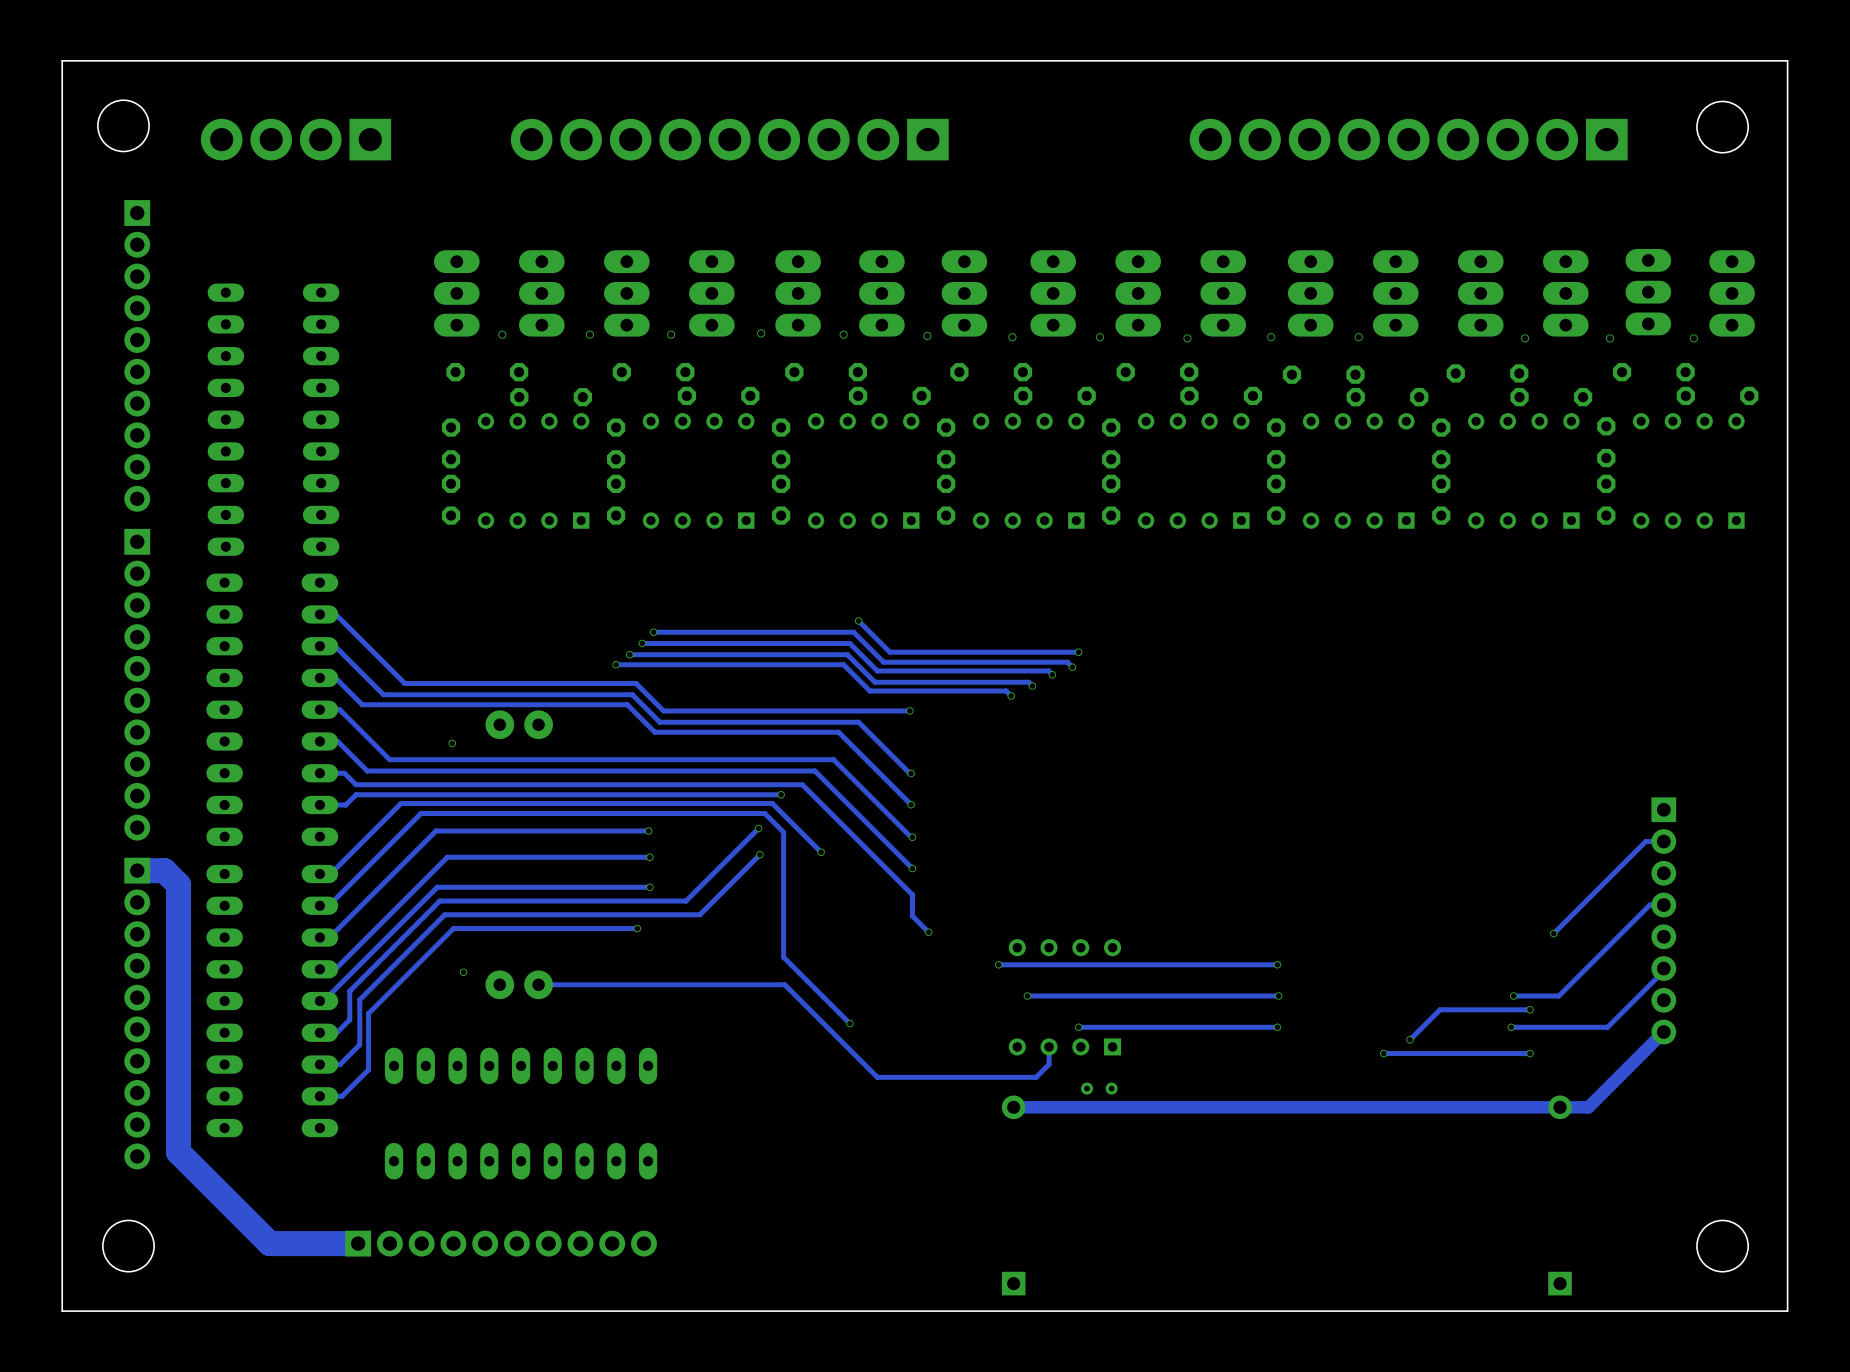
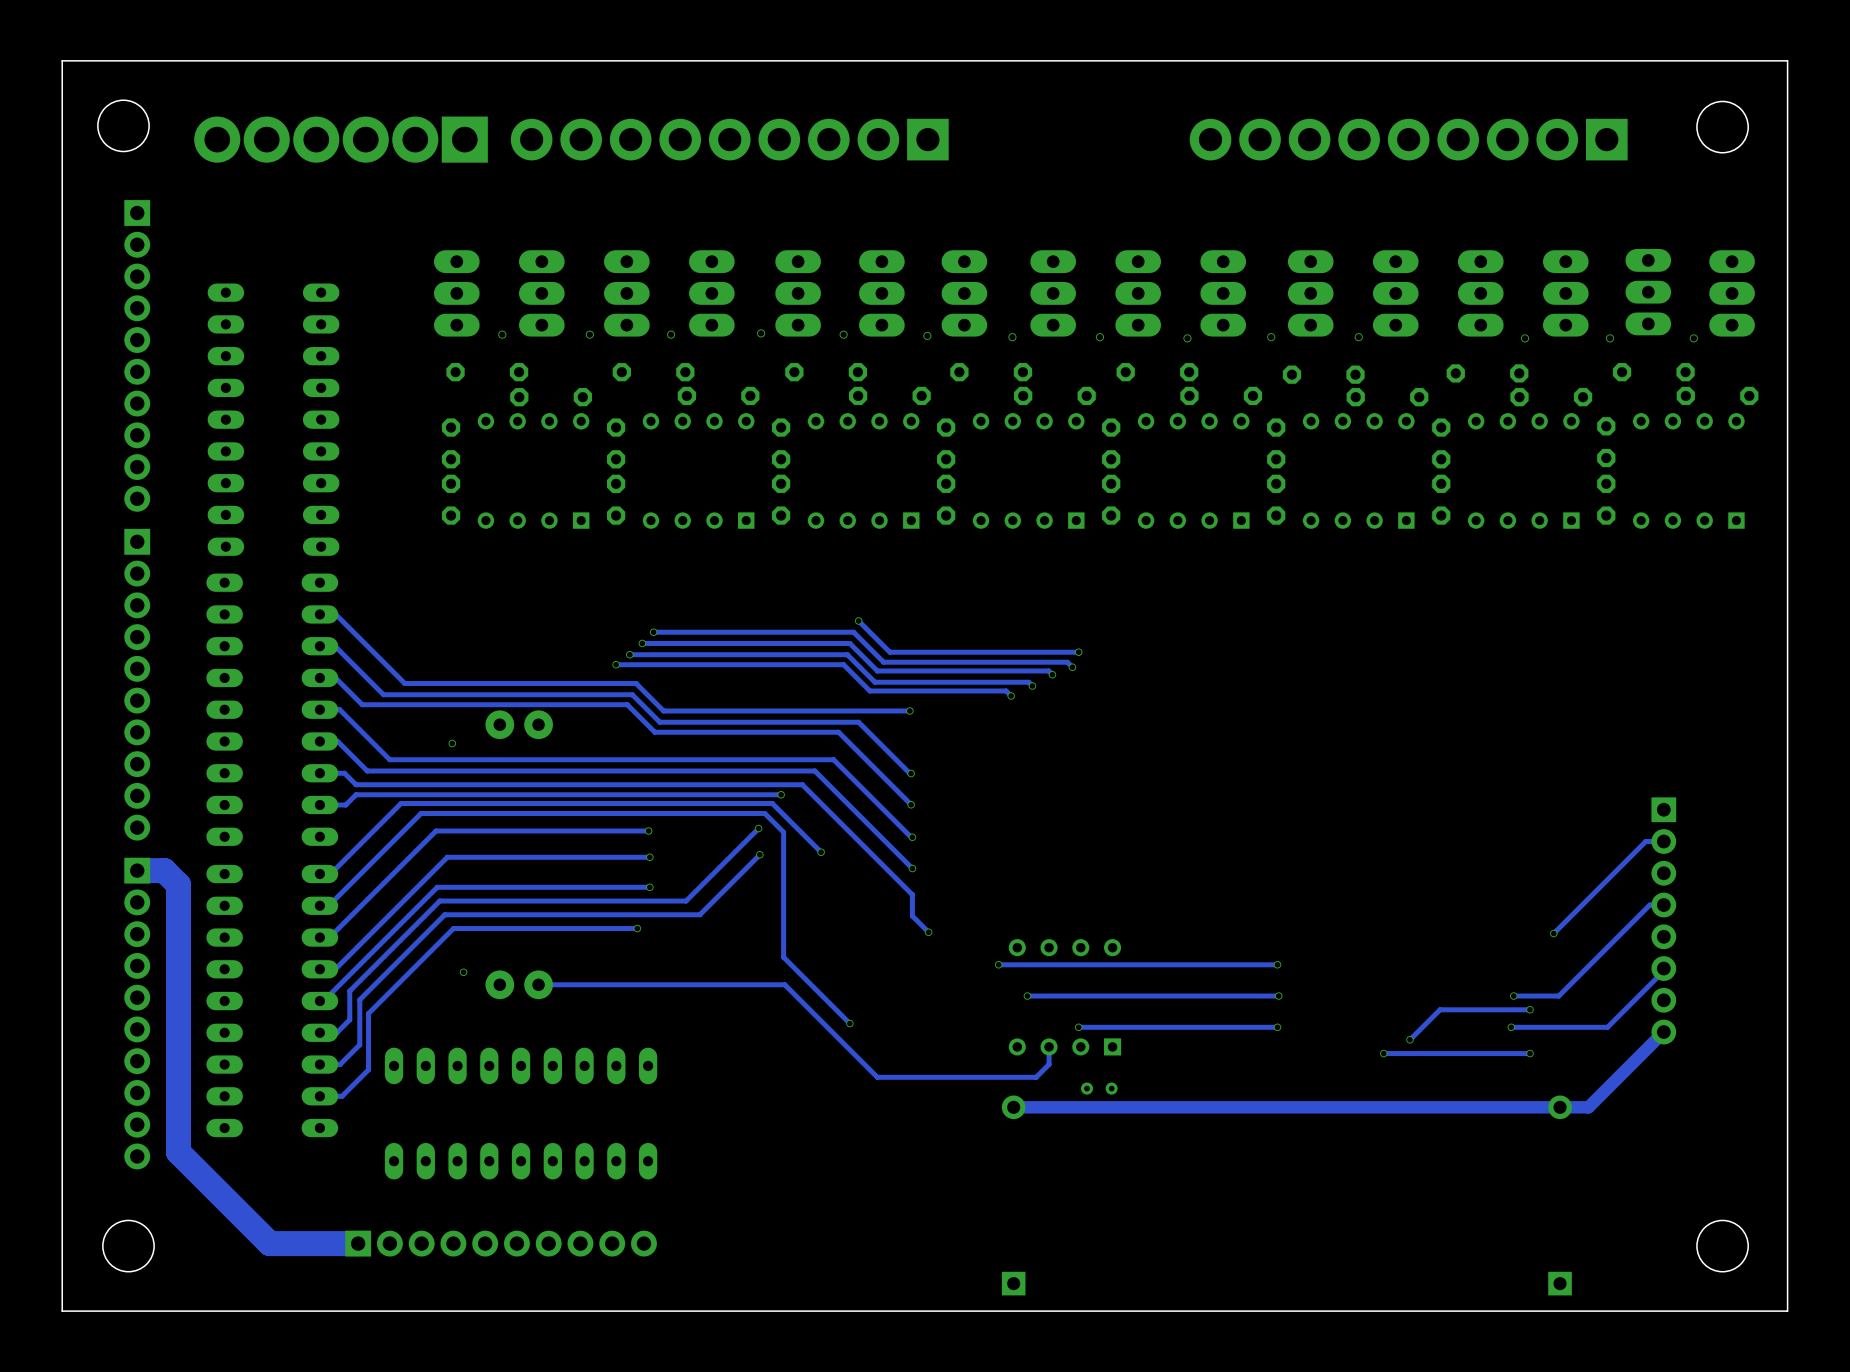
part: (295, 139) -> none
part: none -> (341, 139)

